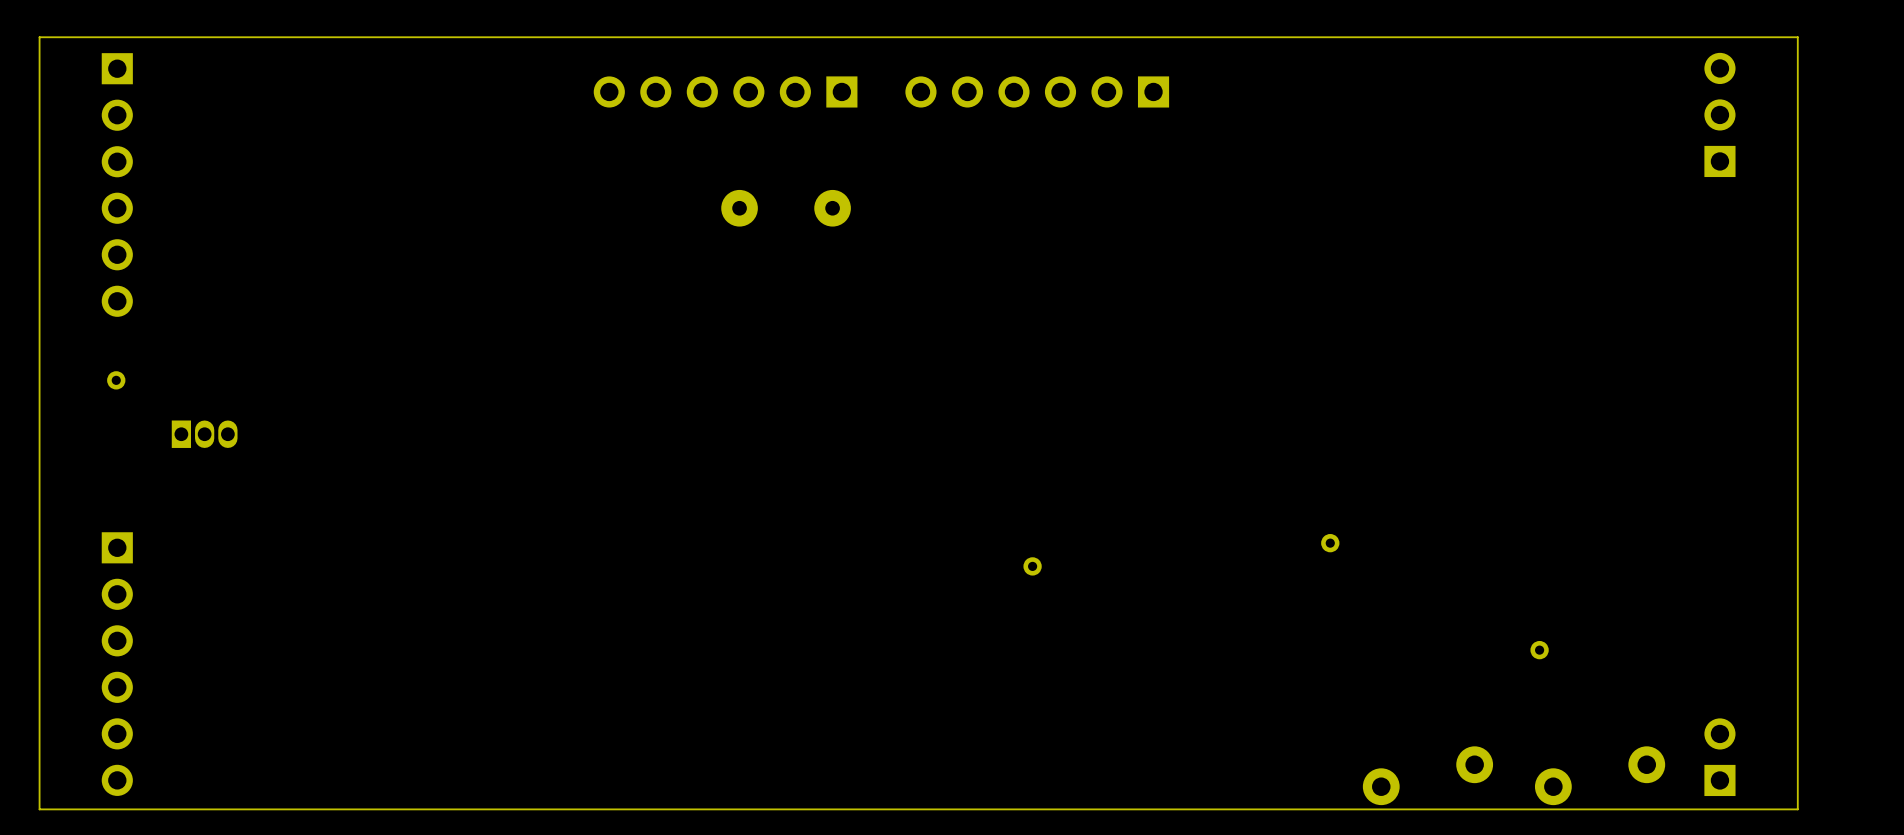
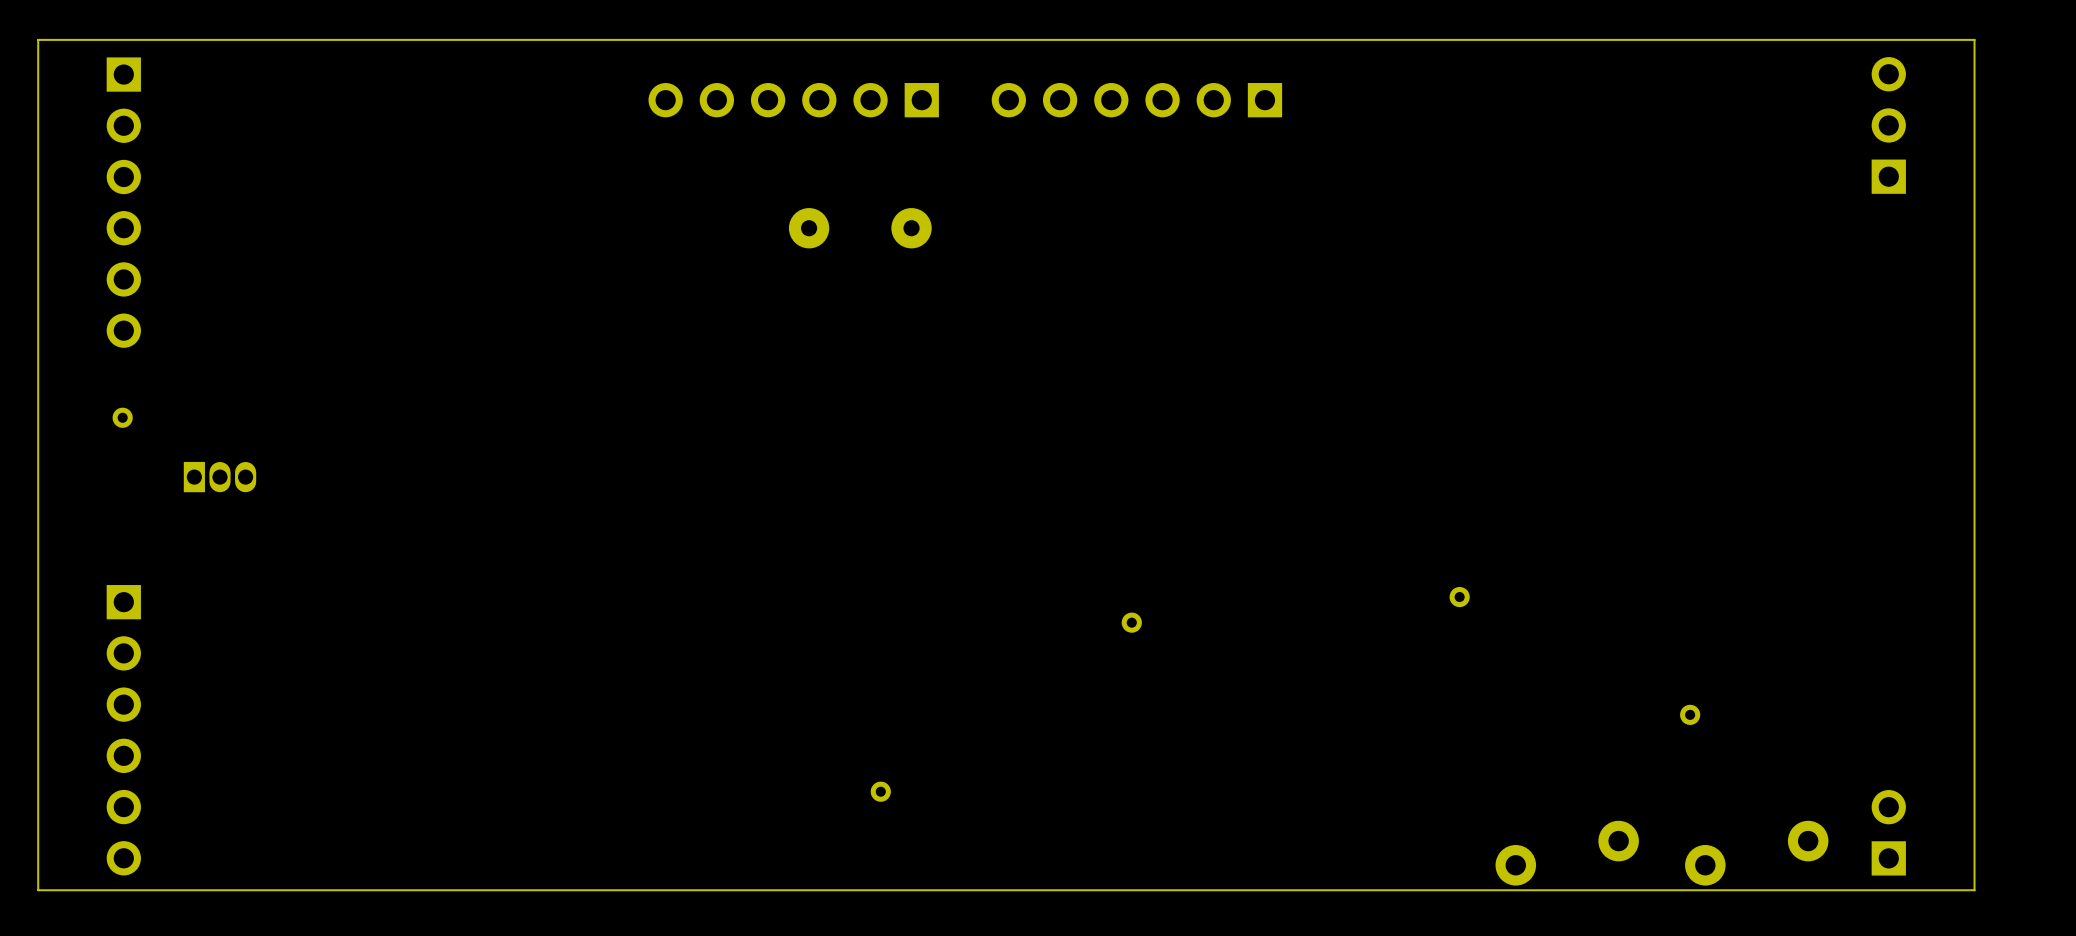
part: none -> (880, 791)

